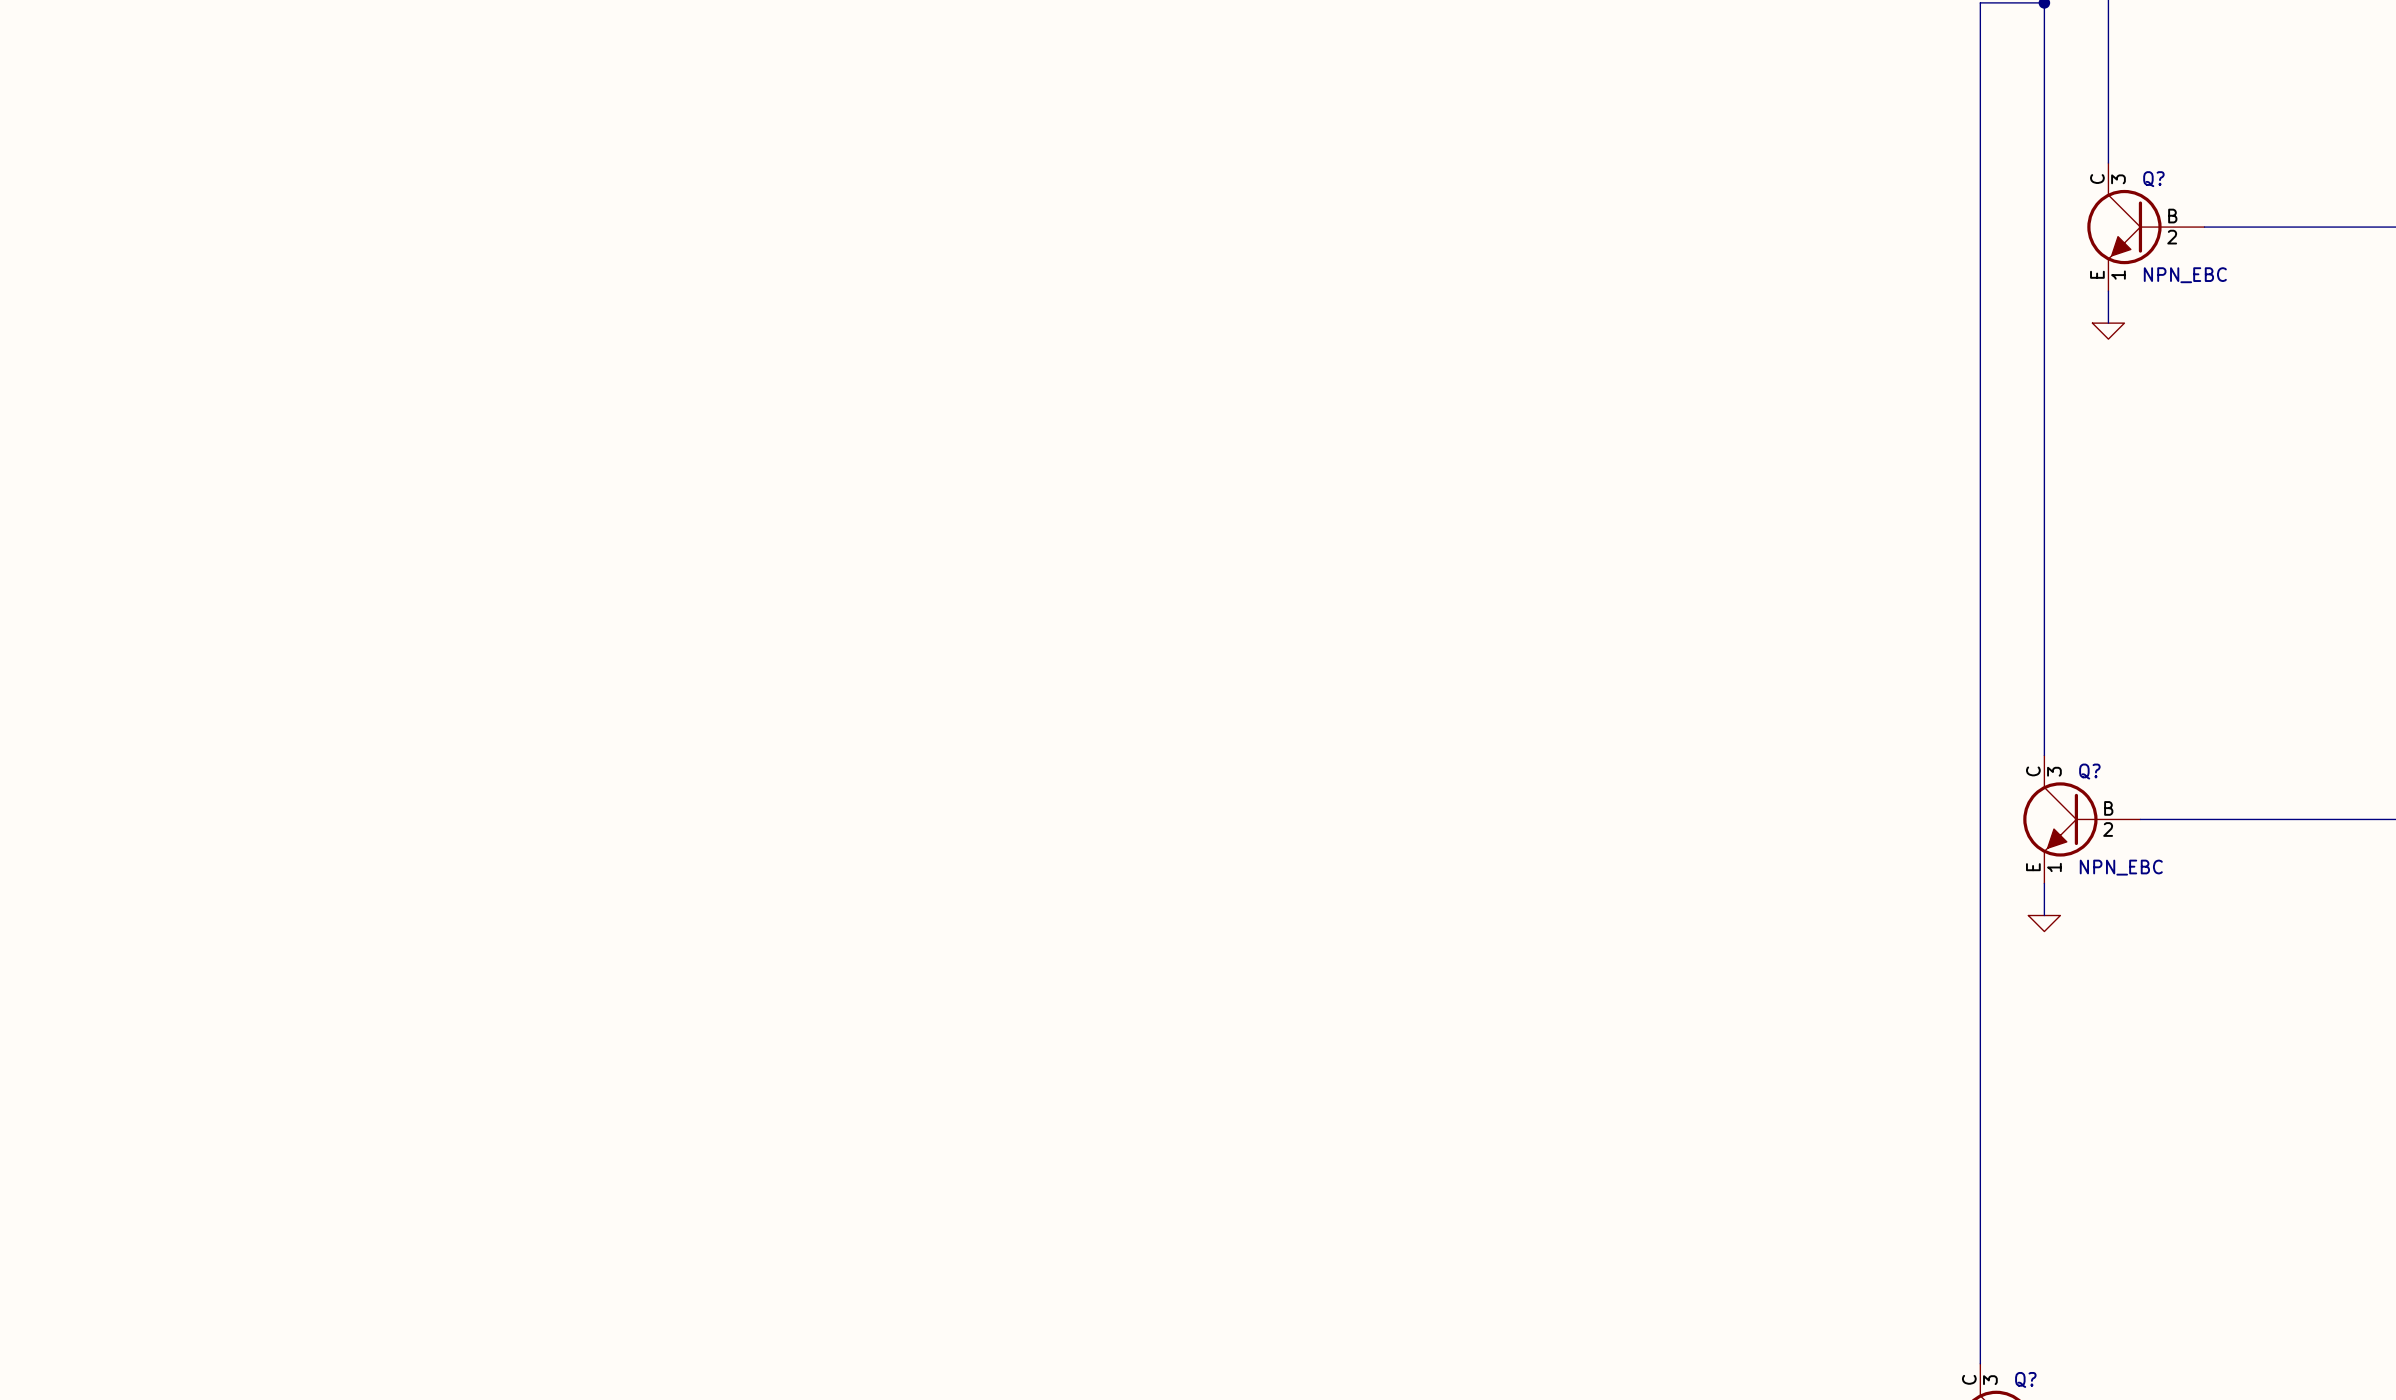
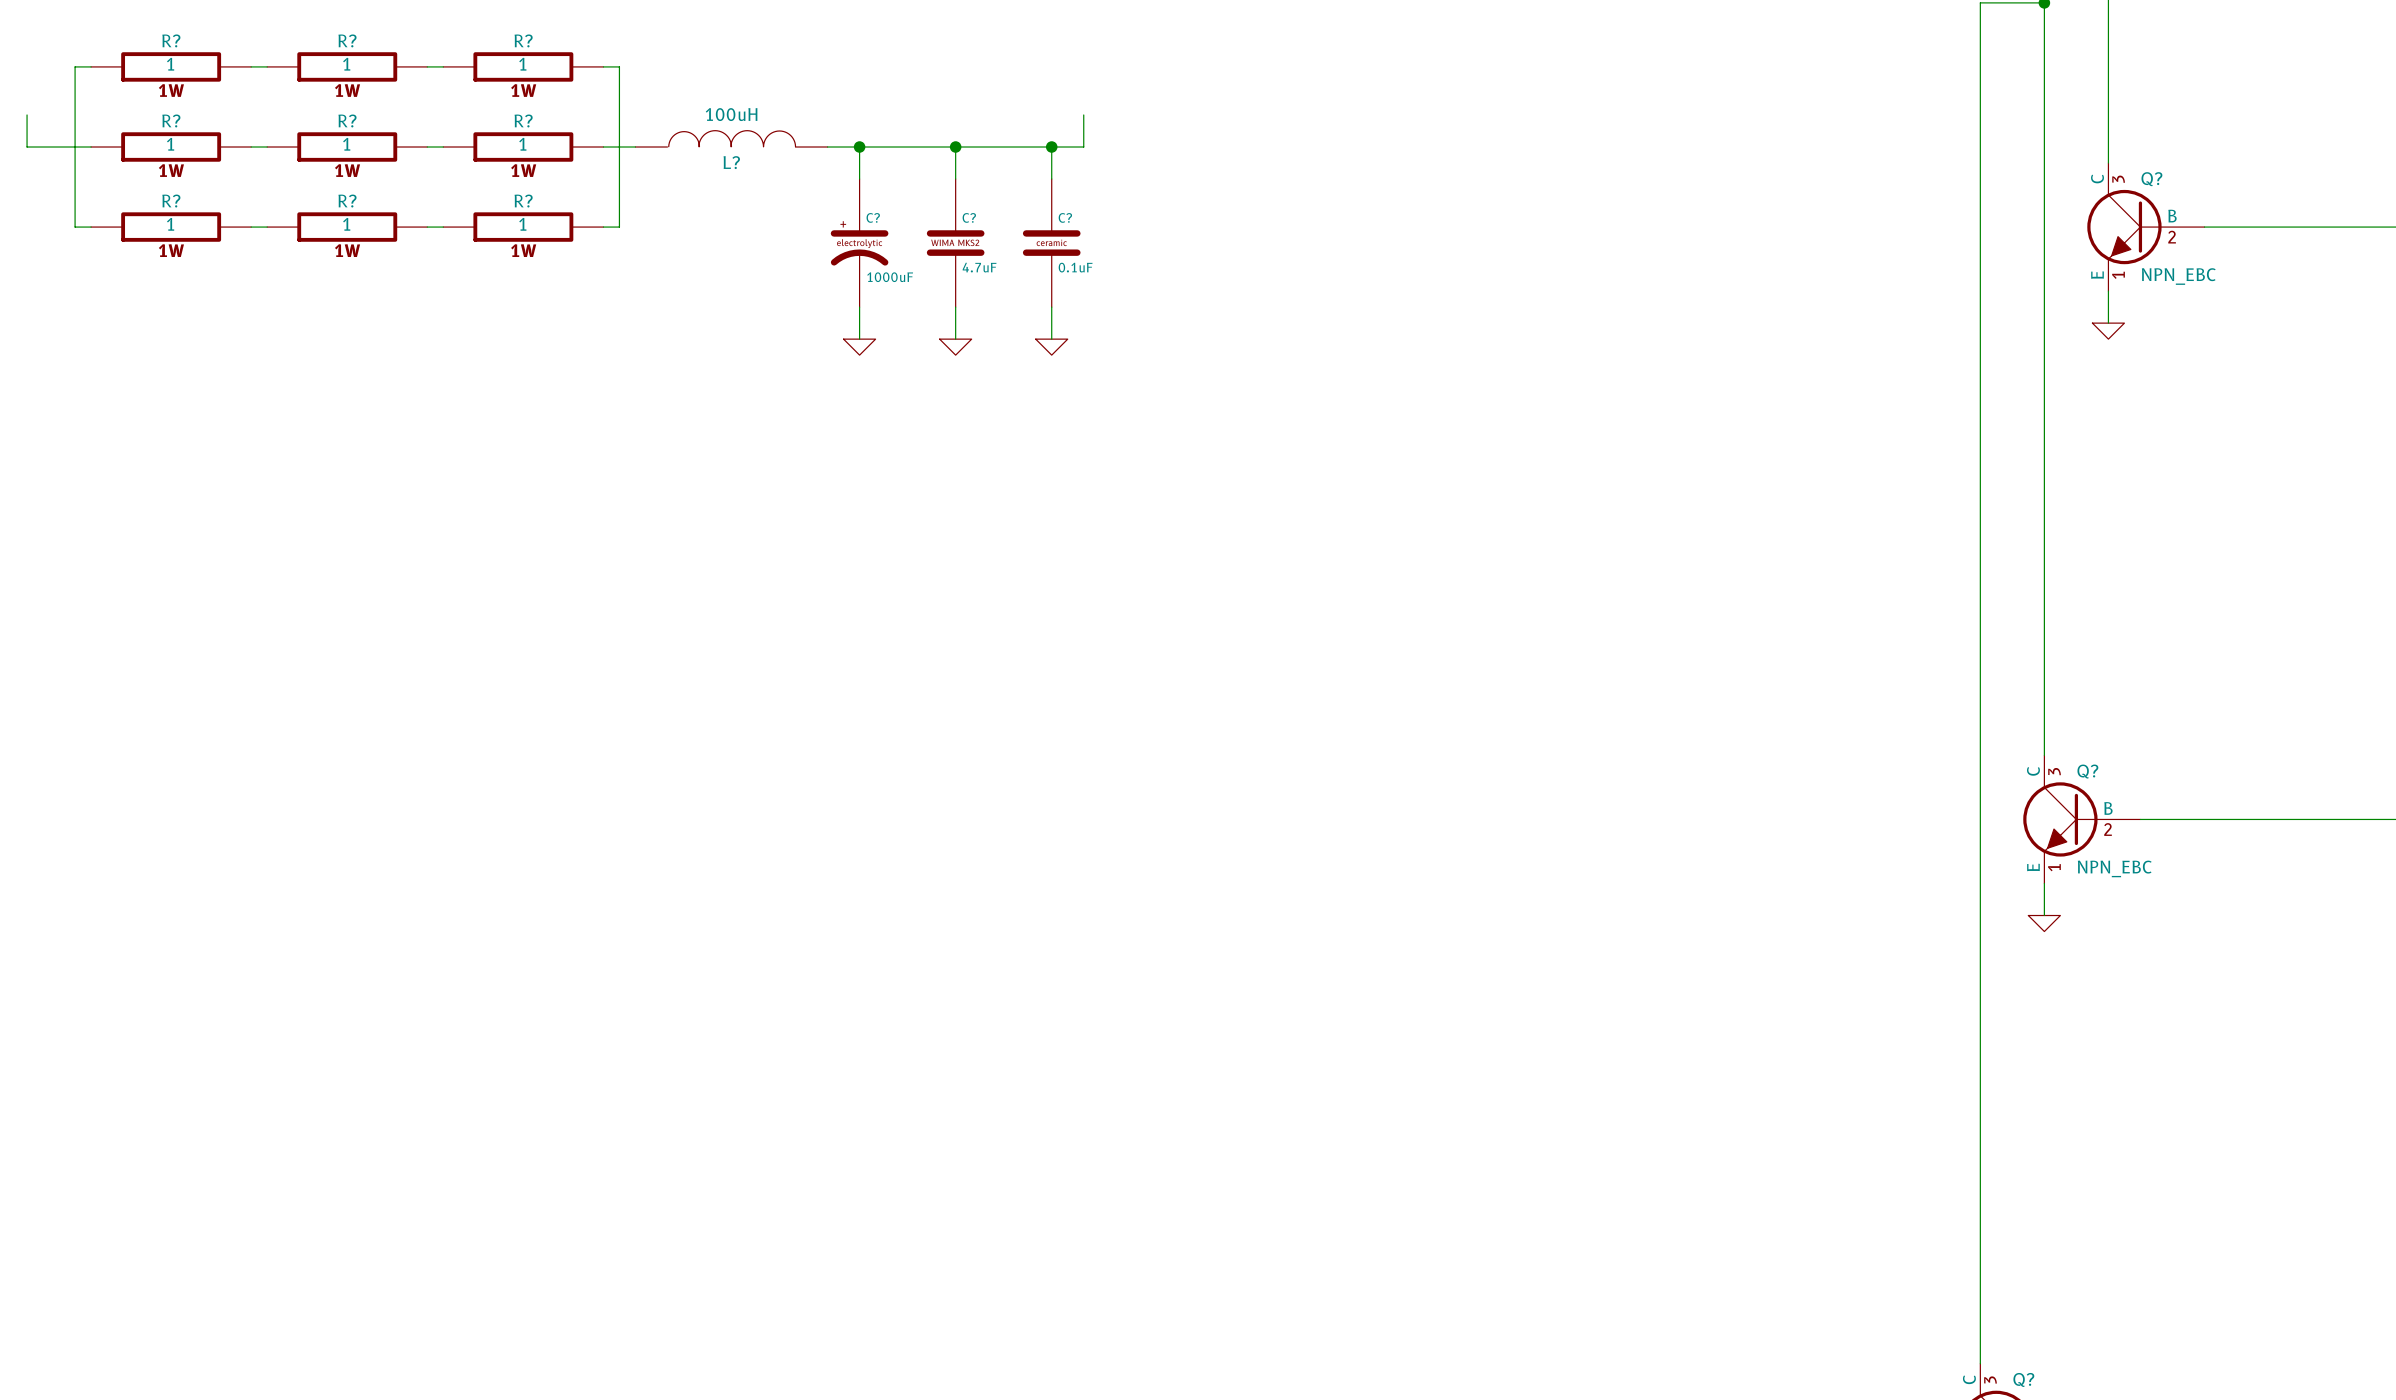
wire: none -> (91, 66) (75, 66) (75, 227) (91, 227)
R?: none -> 1 (171, 66)
wire: none -> (251, 66) (267, 66)
R?: none -> 1 (347, 66)
wire: none -> (427, 66) (443, 66)
R?: none -> 1 (523, 66)
wire: none -> (603, 66) (619, 66) (619, 227) (603, 227)
wire: none -> (27, 114) (27, 147) (91, 147)
wire: none -> (1083, 114) (1083, 147) (827, 147)
L?: none -> 100uH (731, 138)
R?: none -> 1 (171, 147)
wire: none -> (251, 147) (267, 147)
R?: none -> 1 (347, 147)
wire: none -> (427, 147) (443, 147)
R?: none -> 1 (523, 147)
wire: none -> (603, 147) (635, 147)
wire: none -> (859, 147) (859, 179)
junction: none -> (859, 147)
wire: none -> (955, 147) (955, 179)
junction: none -> (955, 147)
wire: none -> (1051, 147) (1051, 179)
junction: none -> (1051, 147)
R?: none -> 1 (171, 227)
wire: none -> (251, 227) (267, 227)
R?: none -> 1 (347, 227)
wire: none -> (427, 227) (443, 227)
R?: none -> 1 (523, 227)
C?: none -> 1000uF (859, 243)
C?: none -> 4.7uF (955, 243)
C?: none -> 0.1uF (1051, 243)
wire: none -> (859, 307) (859, 339)
wire: none -> (955, 307) (955, 339)
wire: none -> (1051, 307) (1051, 339)
power symbol: none -> (859, 347)
power symbol: none -> (955, 347)
power symbol: none -> (1051, 347)

